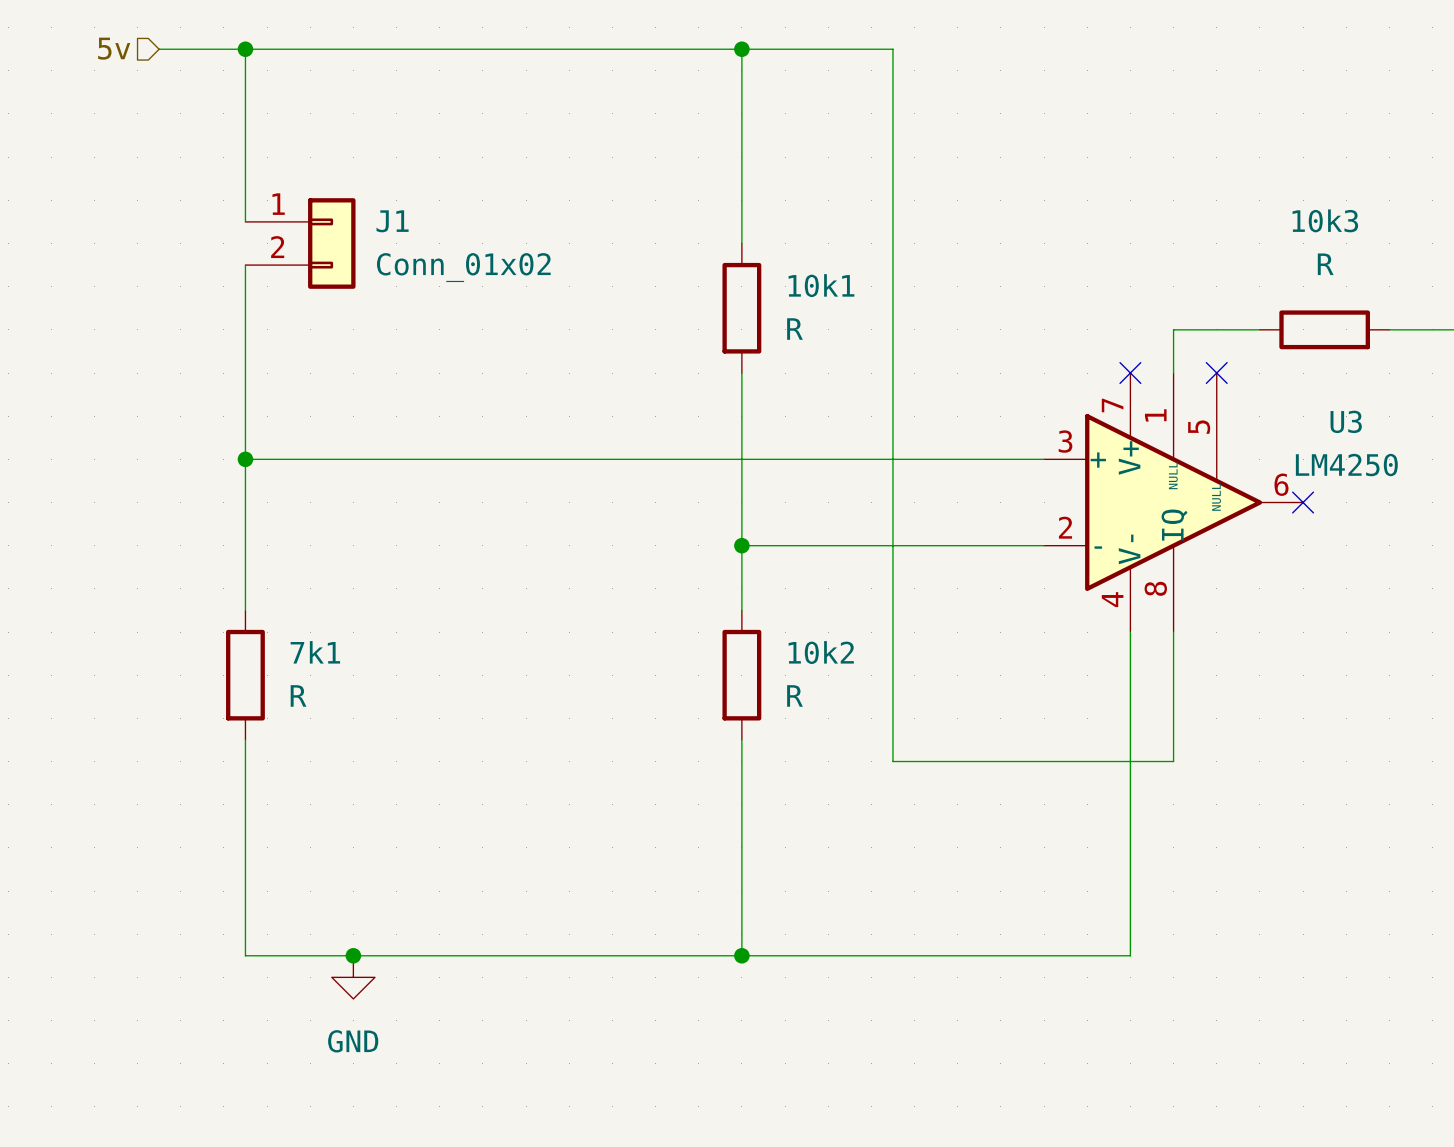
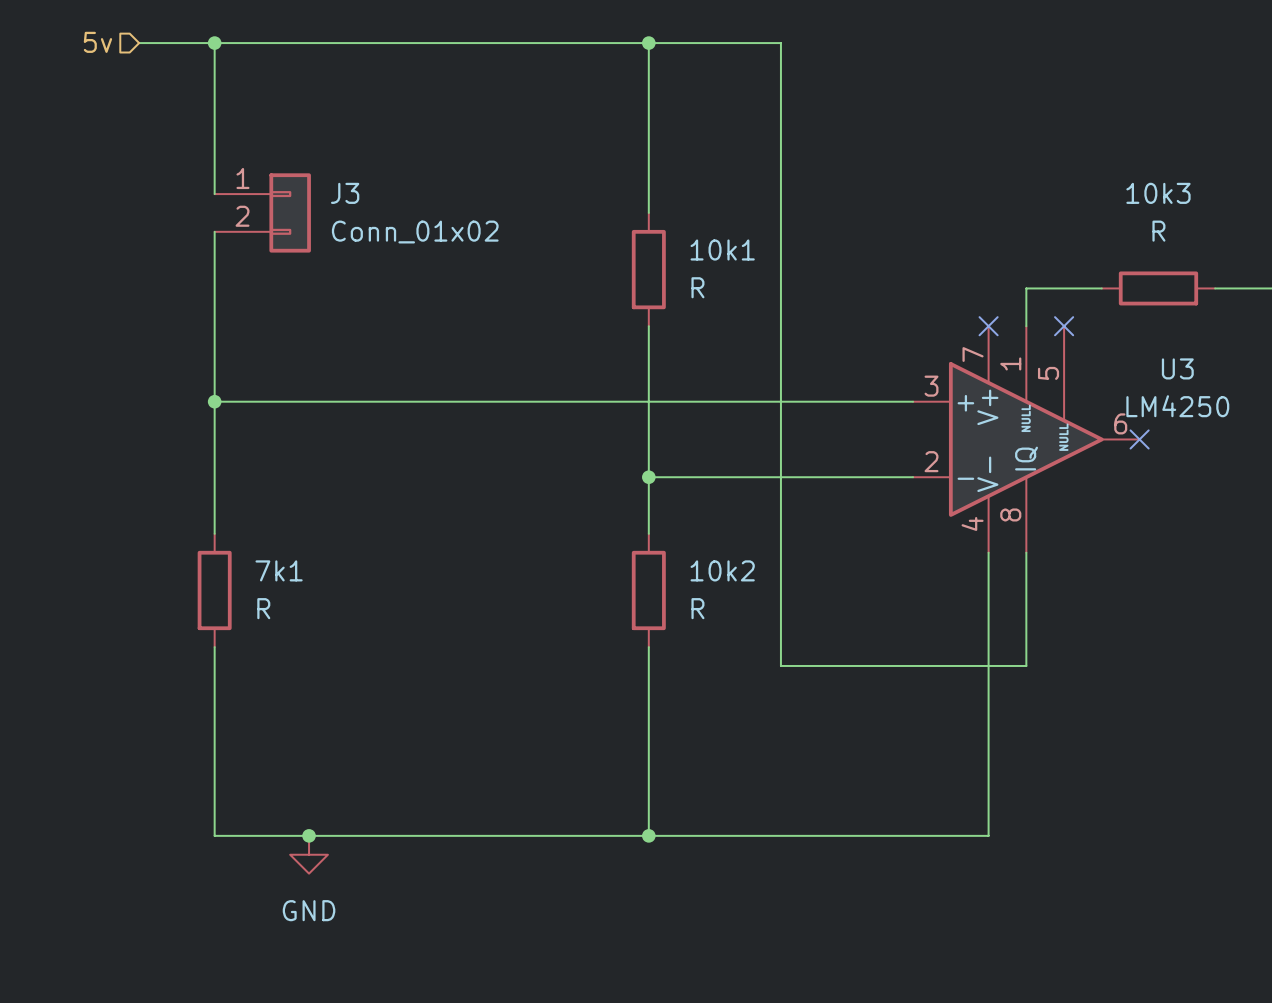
J1 name: J1 (392, 221) -> J3 (345, 193)

